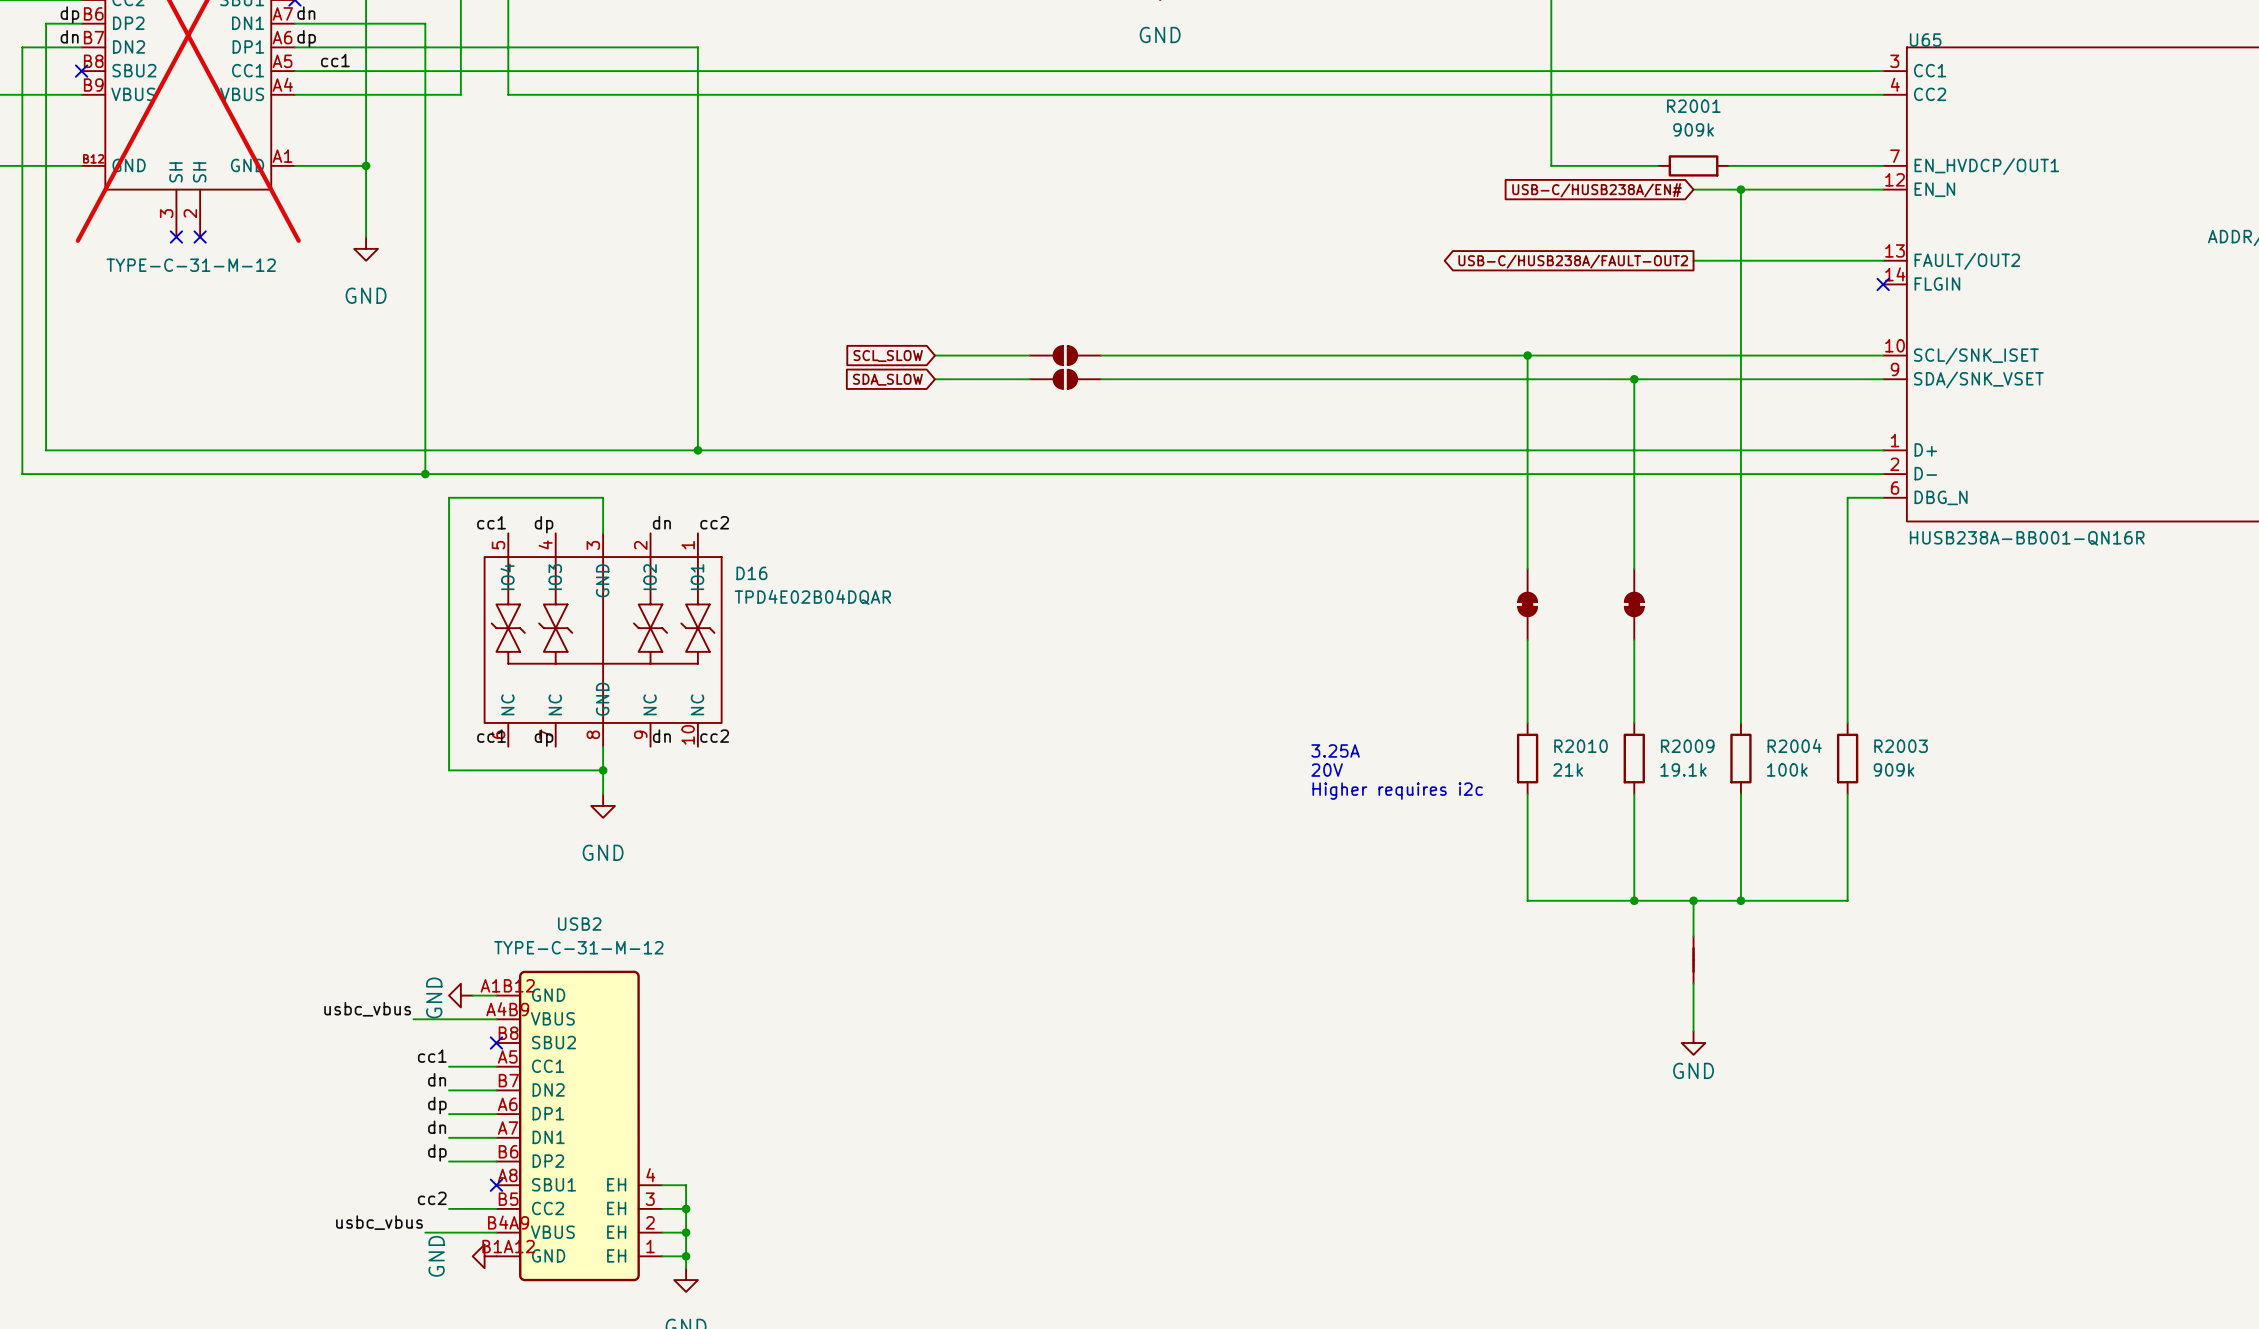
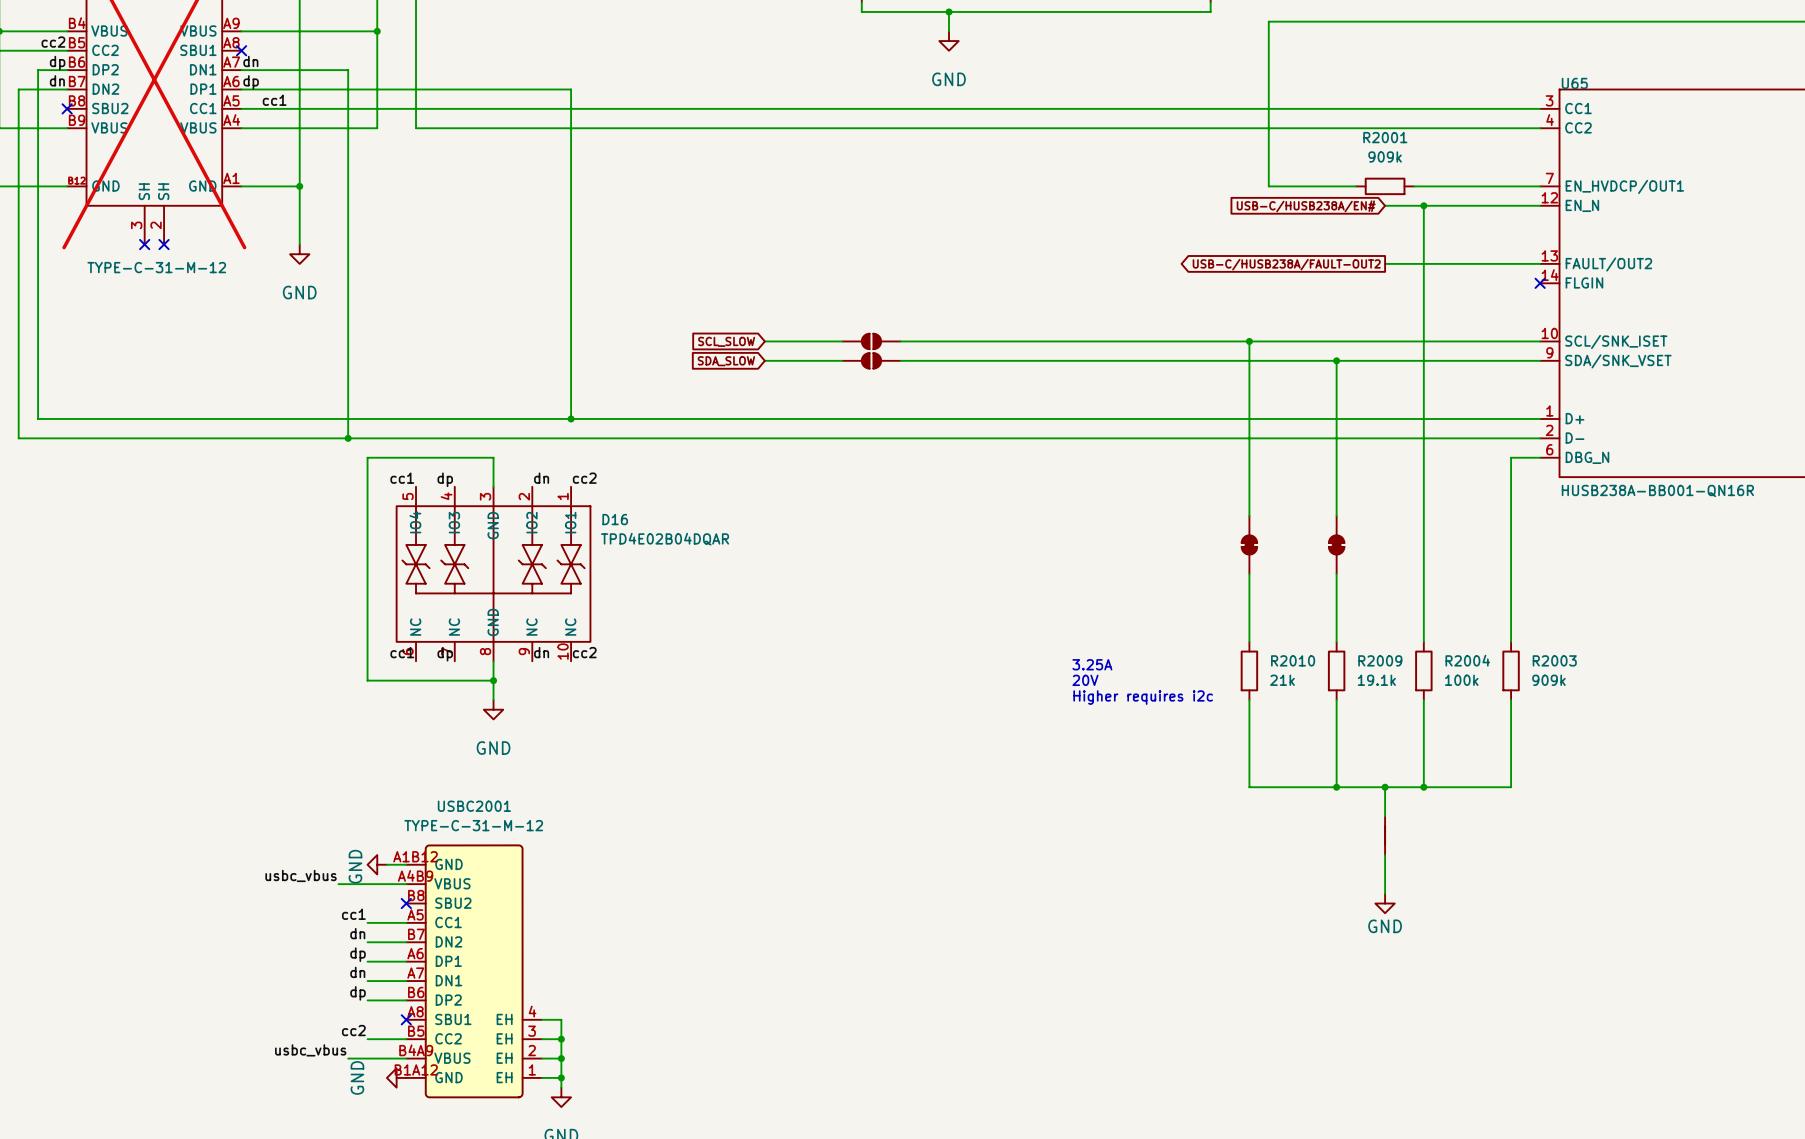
USB2 name: USB2 (579, 924) -> USBC2001 (474, 806)

